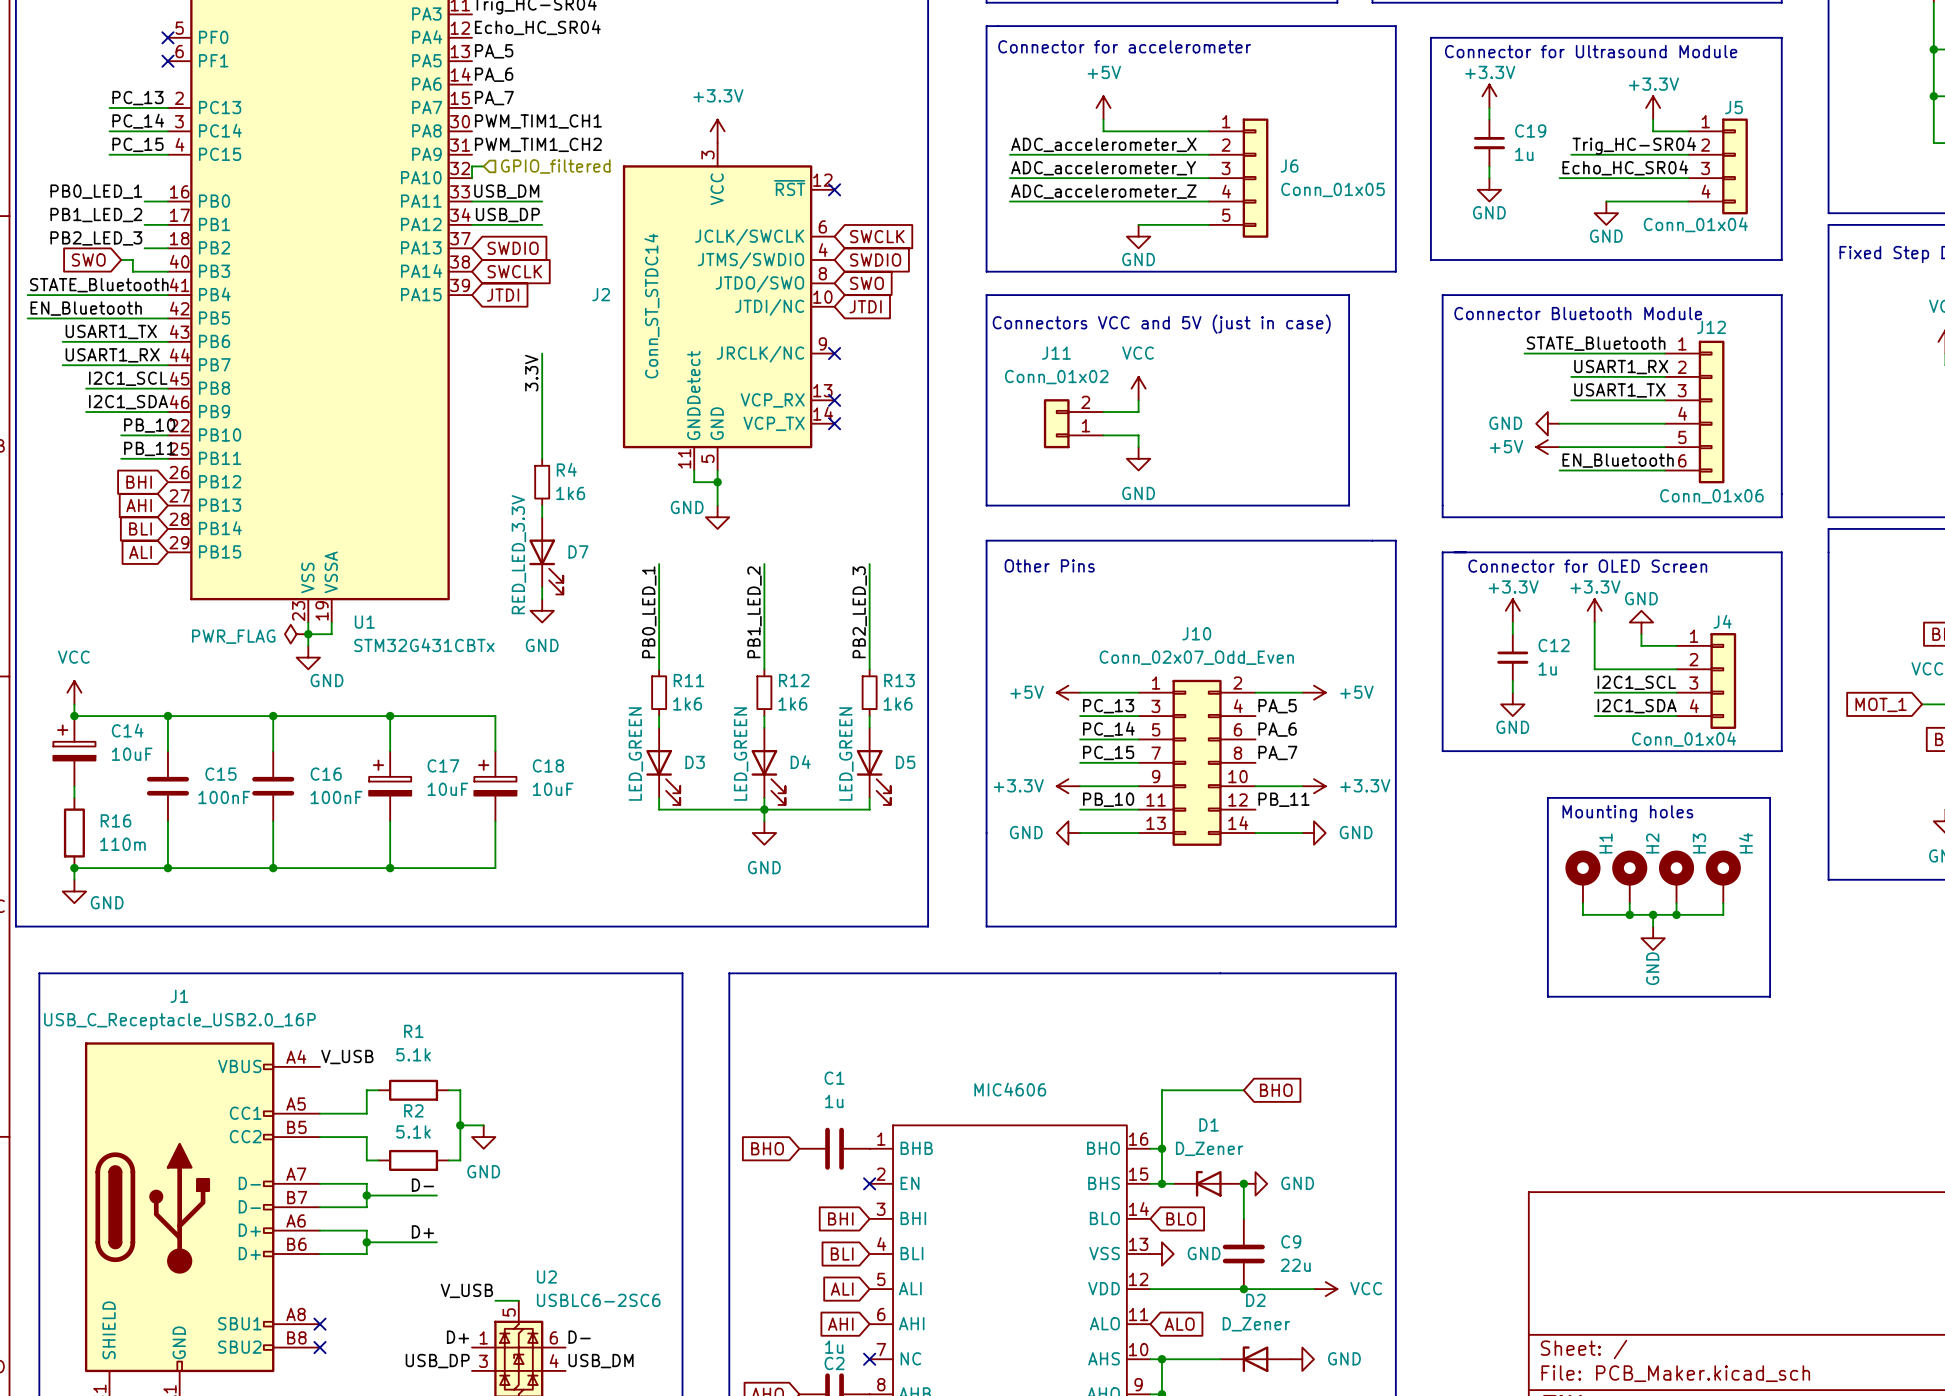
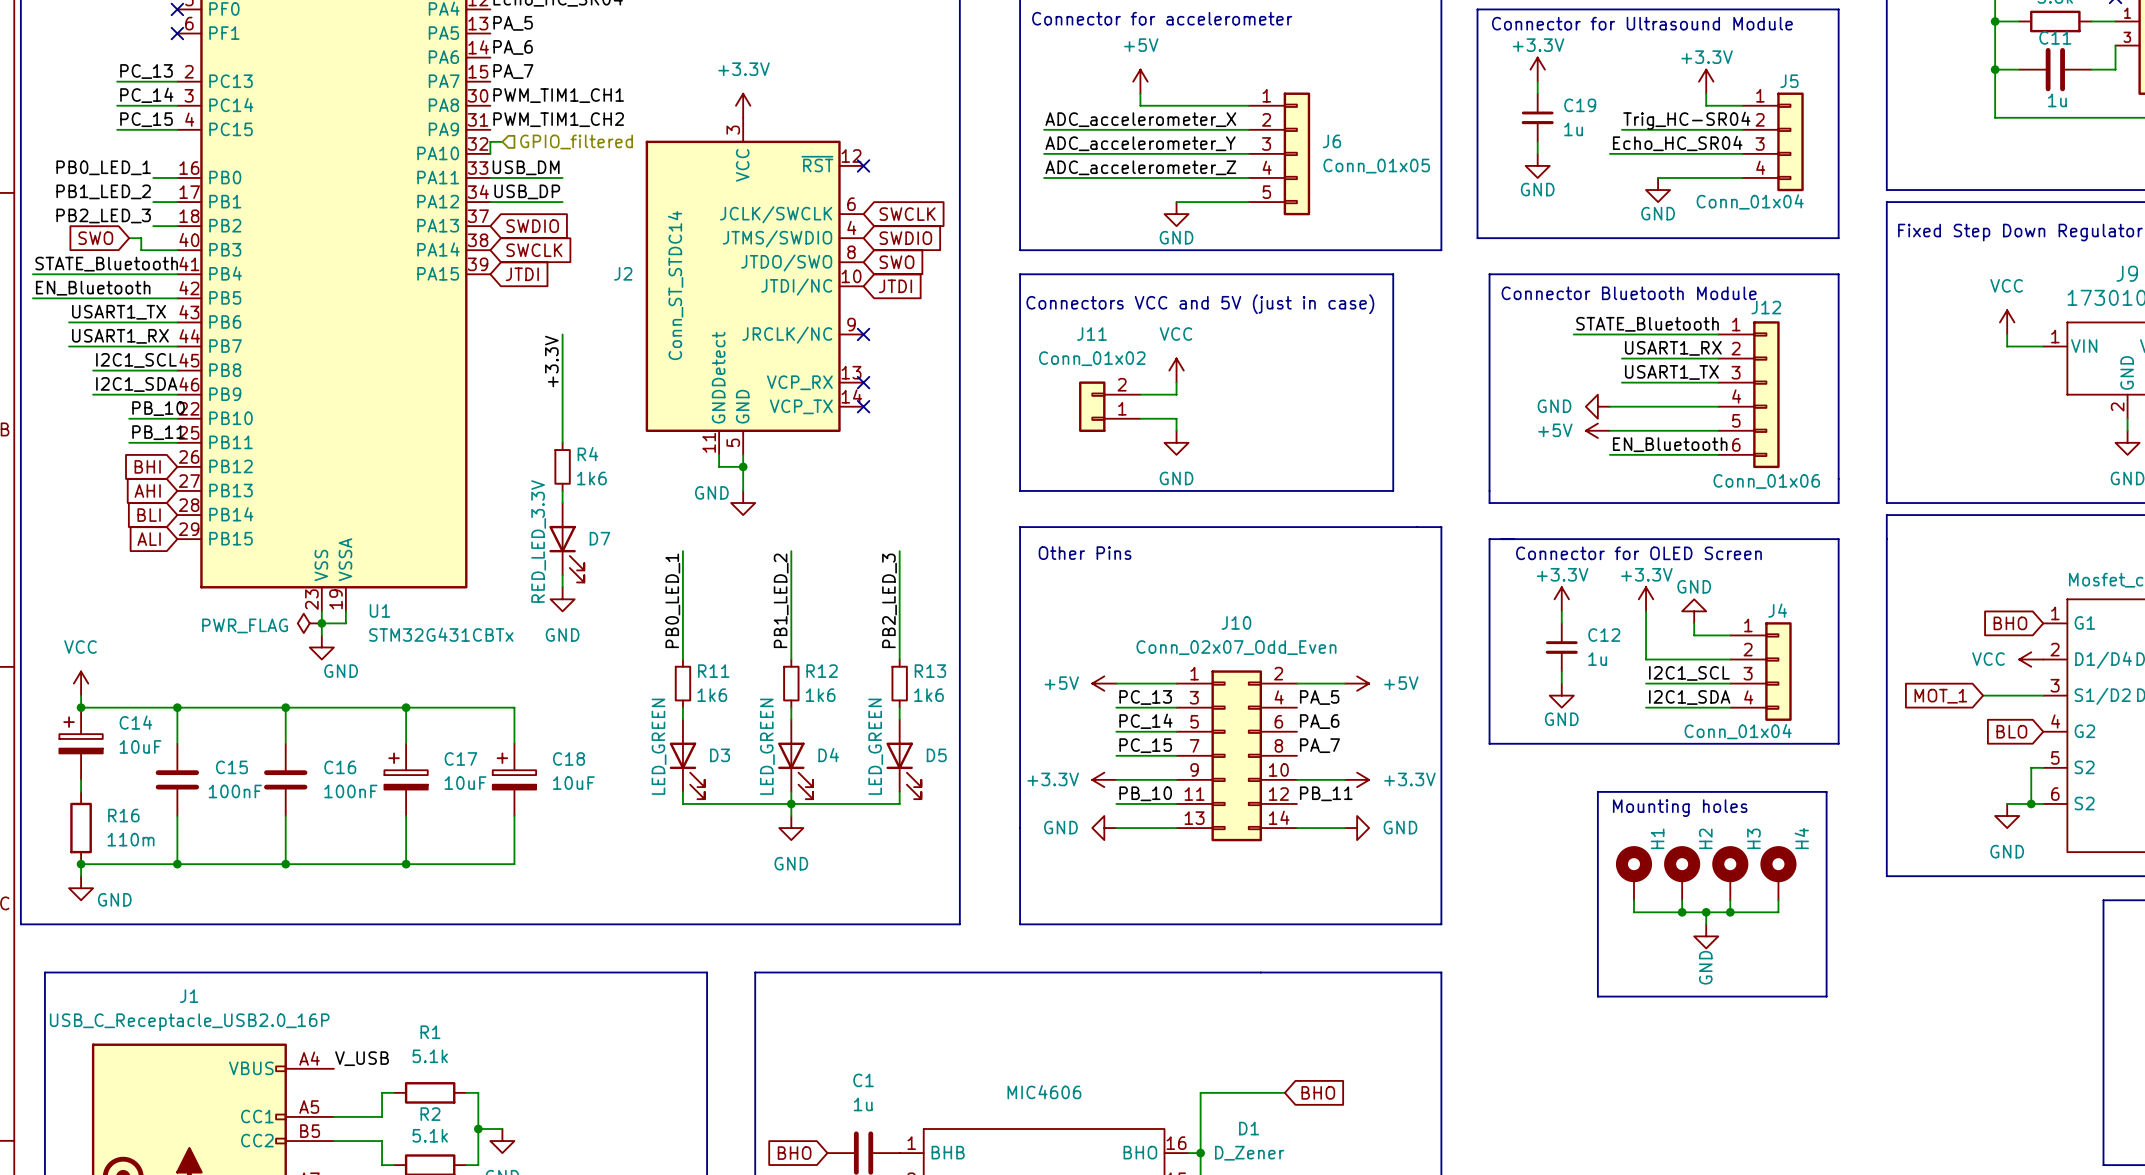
label: 3.3V (531, 373) -> +3.3V (551, 361)

